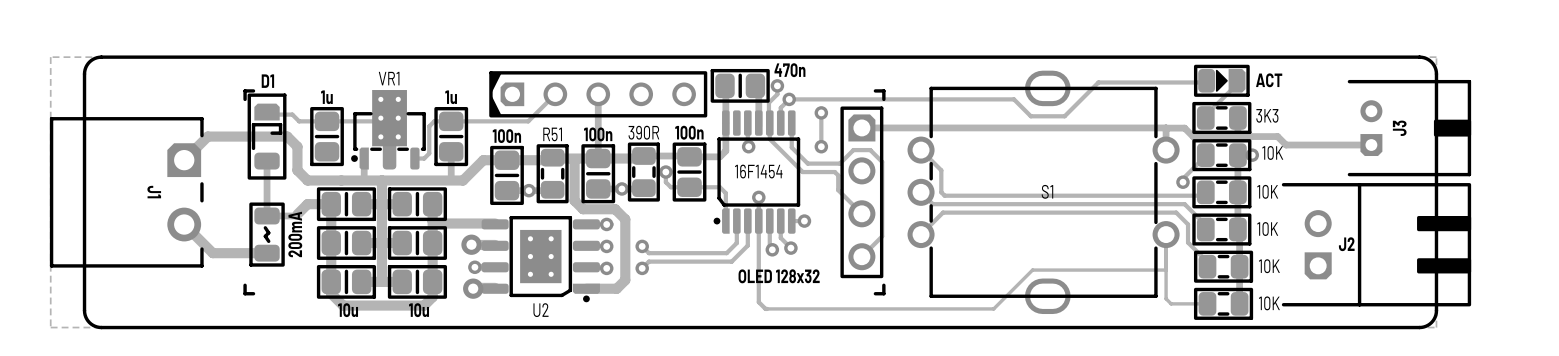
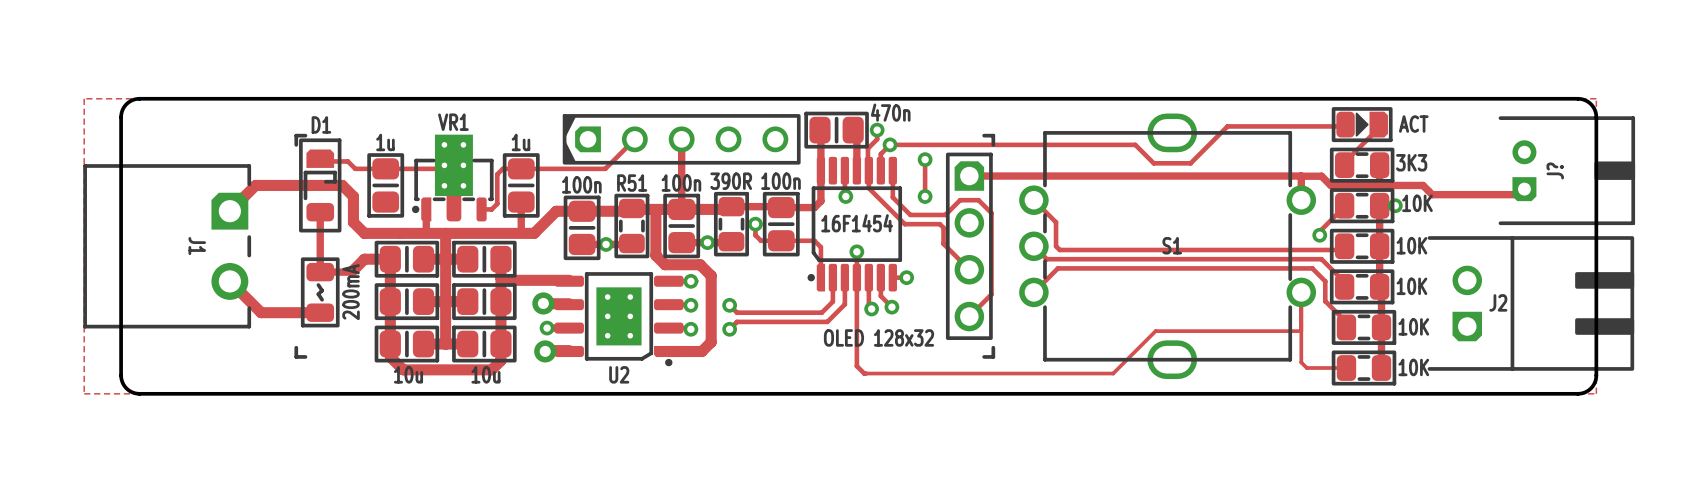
J?: none -> (1566, 170)
J3: (1409, 128) -> none

